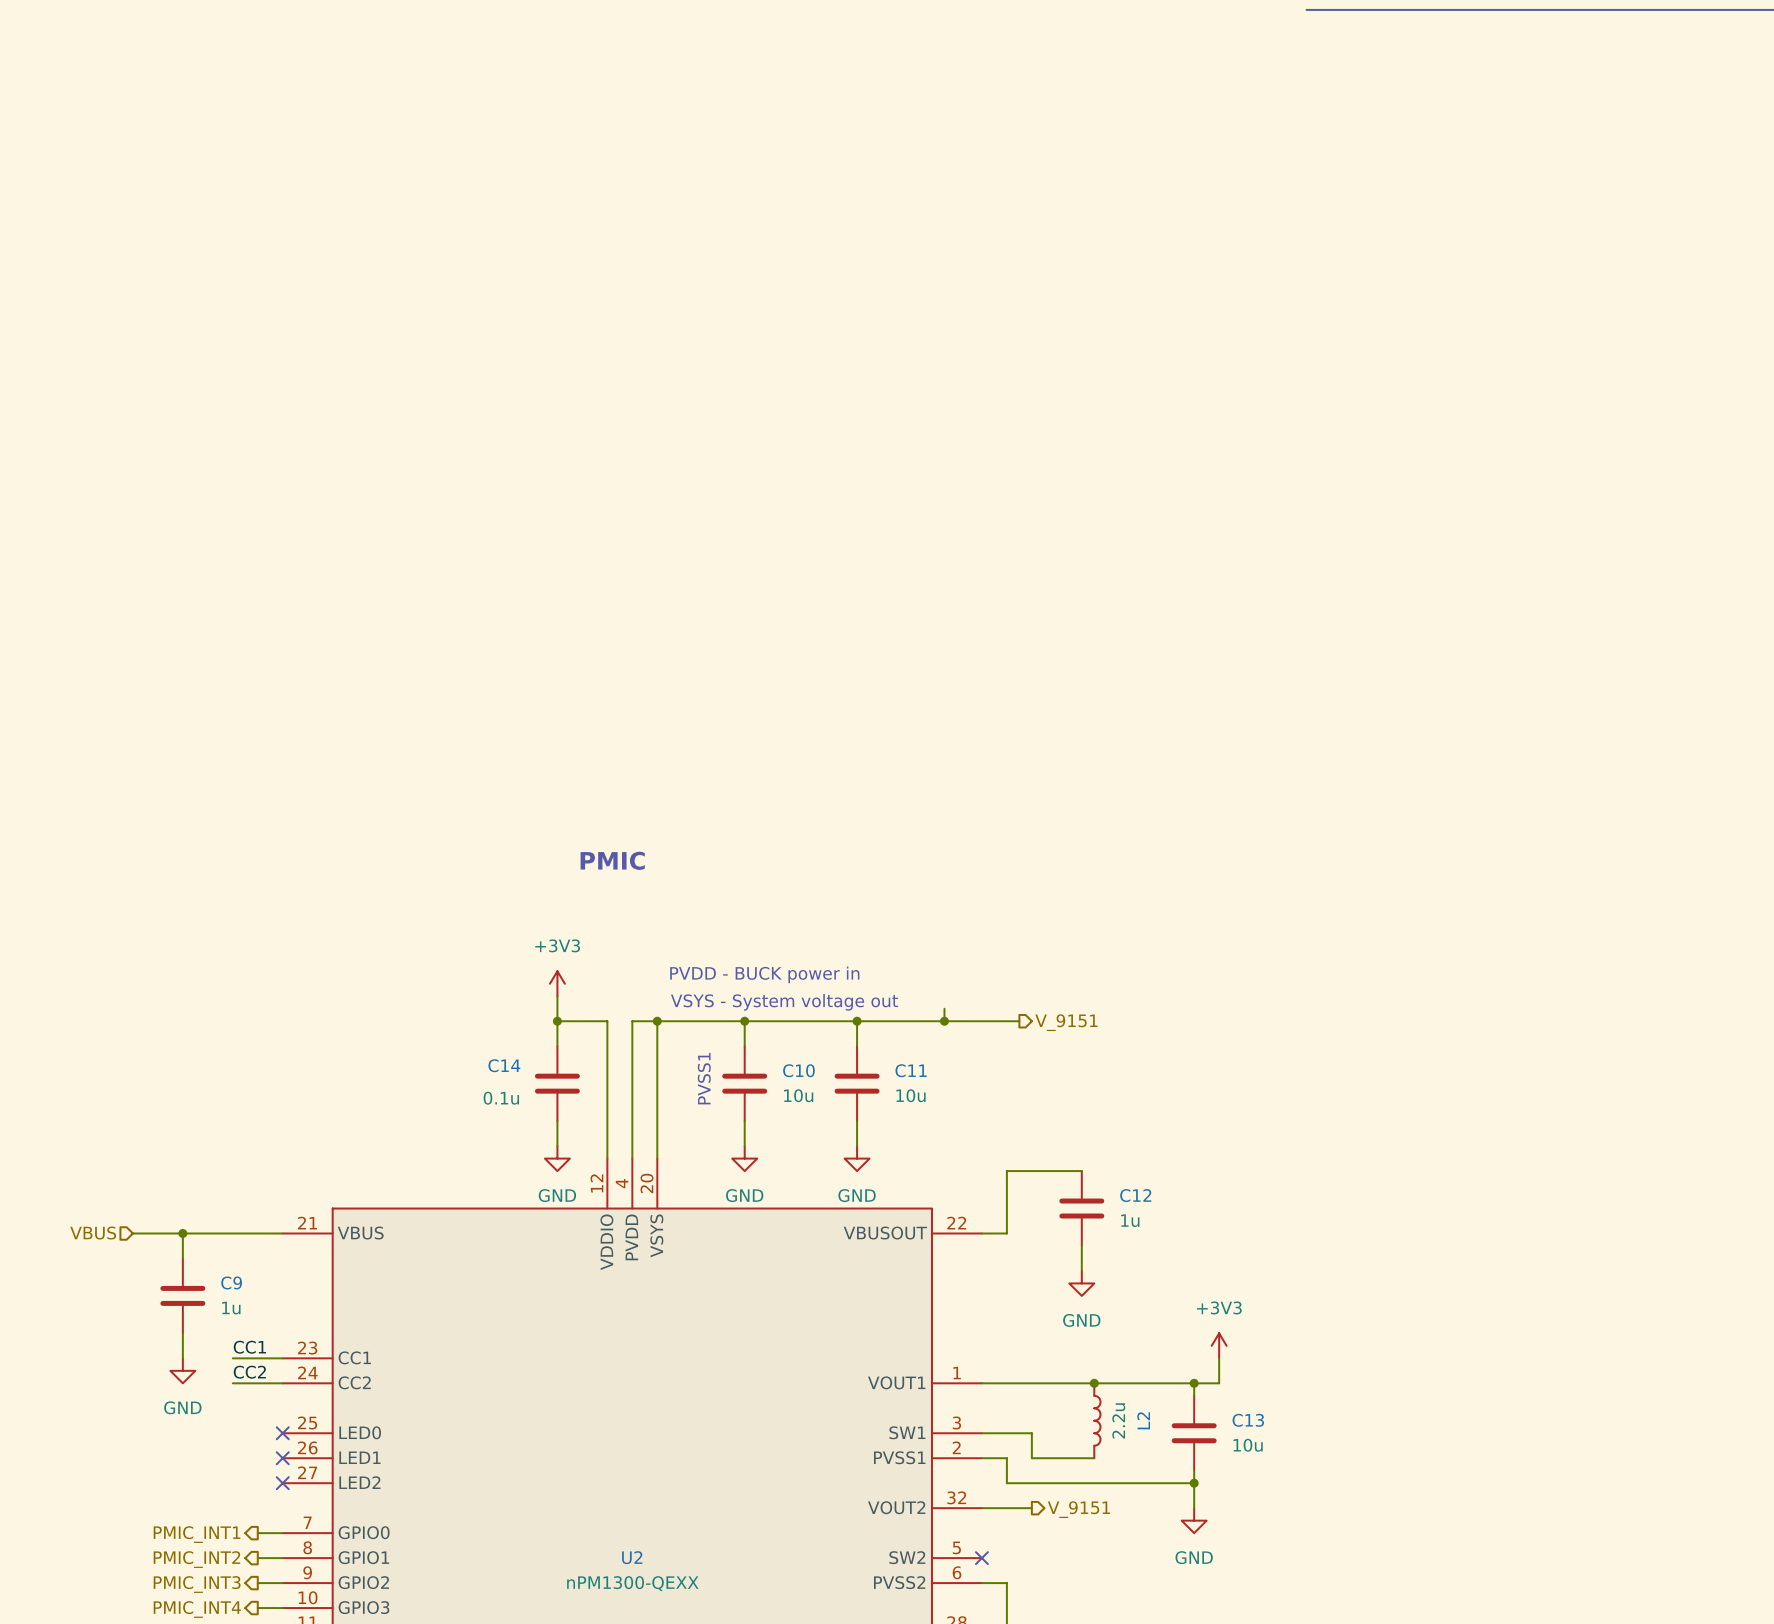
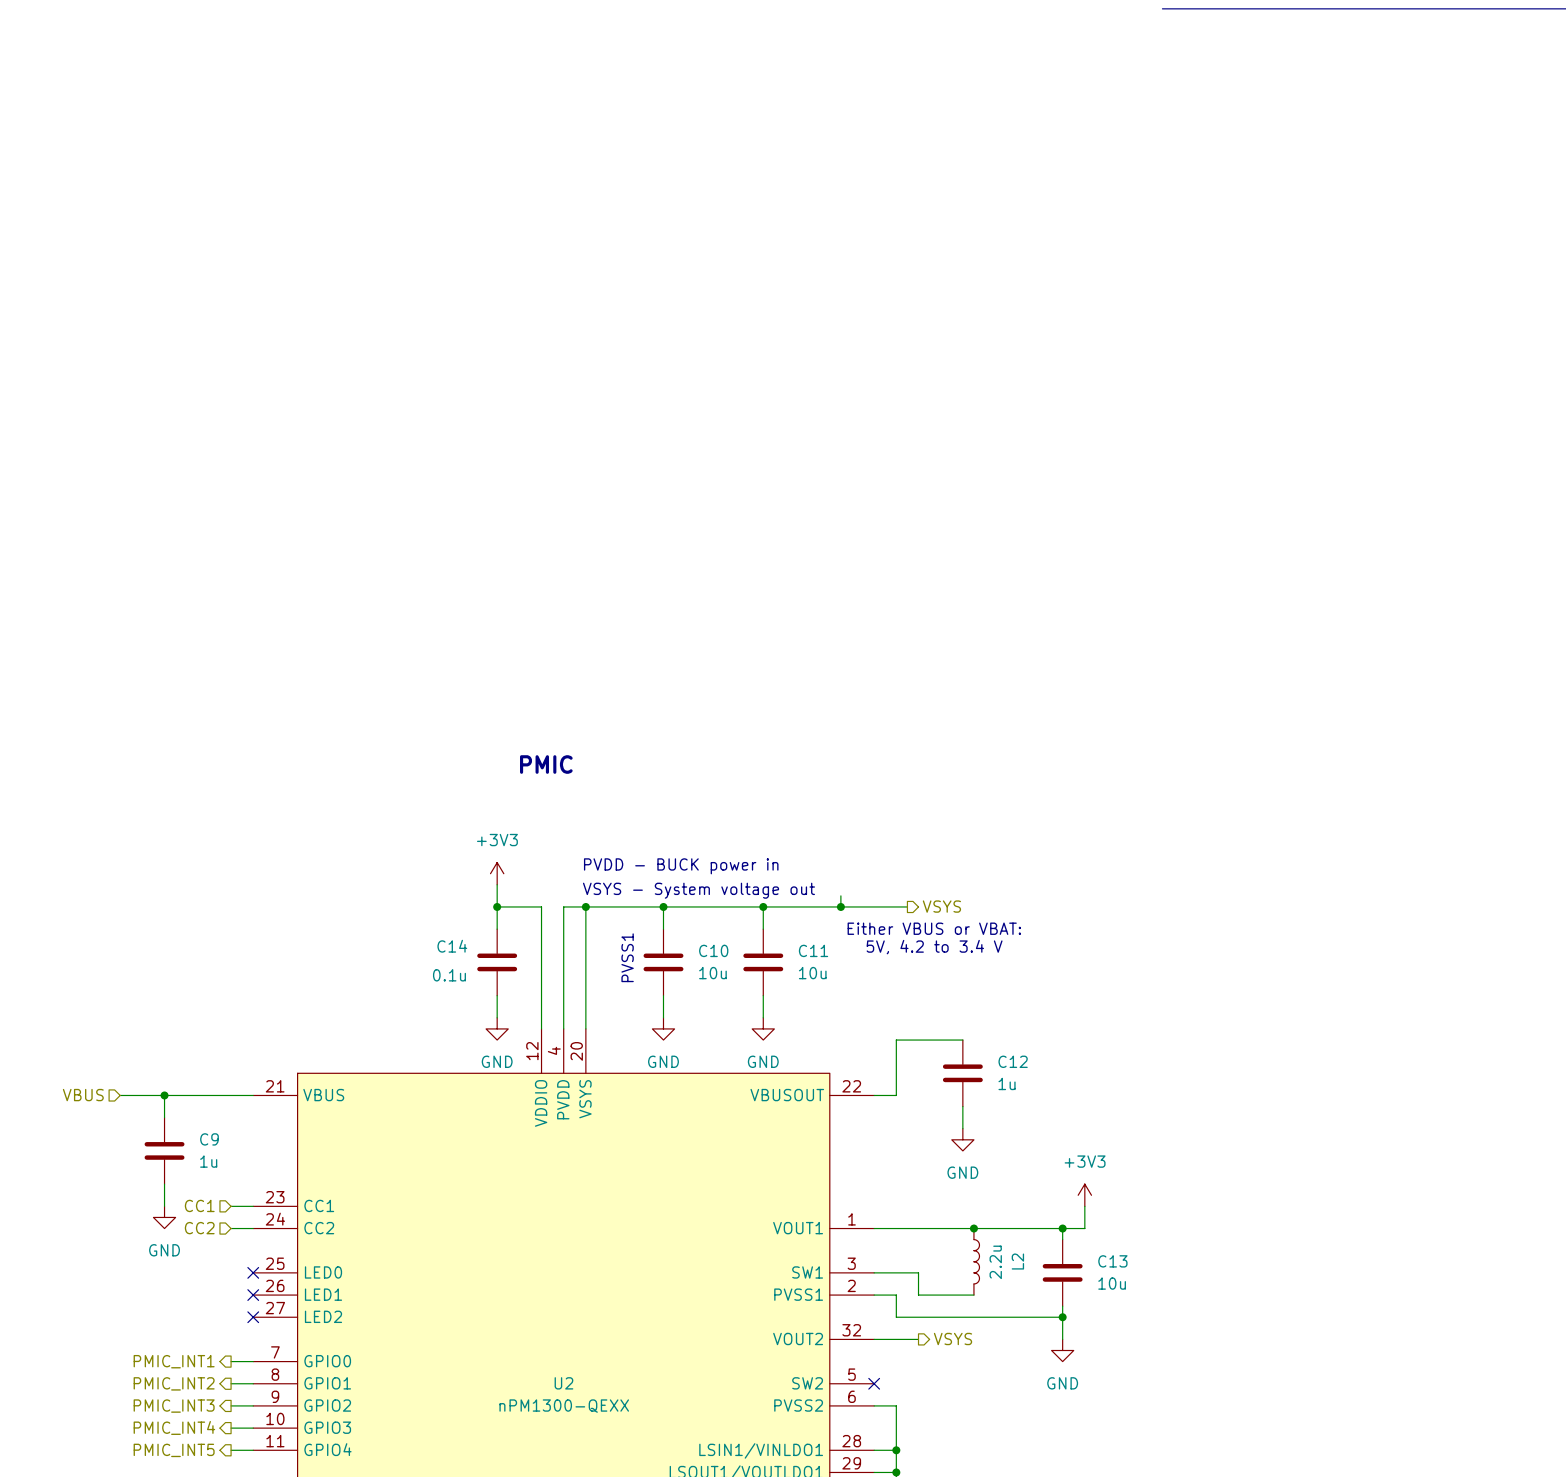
hierarchical label: V_9151 (1066, 1022) -> VSYS (941, 906)
text: none -> Either VBUS or VBAT: (934, 928)
text: none -> 5V, 4.2 to 3.4 V (934, 947)
label: CC1 (249, 1347) -> none
hierarchical label: none -> CC1 (199, 1205)
wire: (232, 1358) (257, 1358) -> none
label: CC2 (249, 1372) -> none
hierarchical label: none -> CC2 (199, 1228)
wire: (232, 1383) (257, 1383) -> none
hierarchical label: V_9151 (1078, 1509) -> VSYS (953, 1338)

